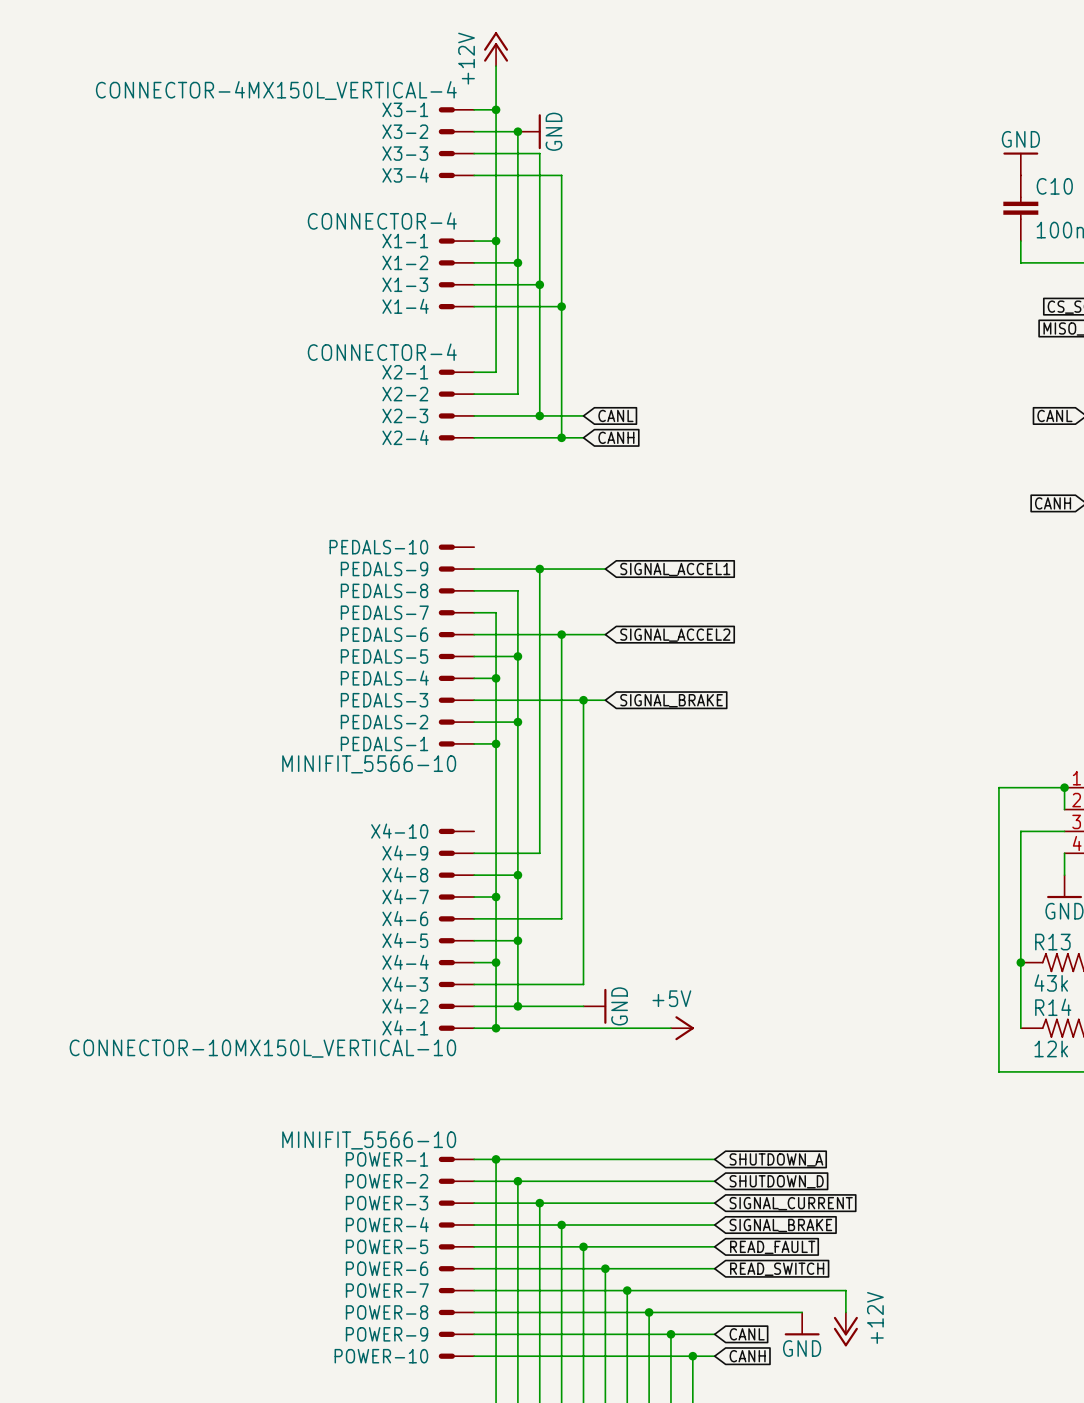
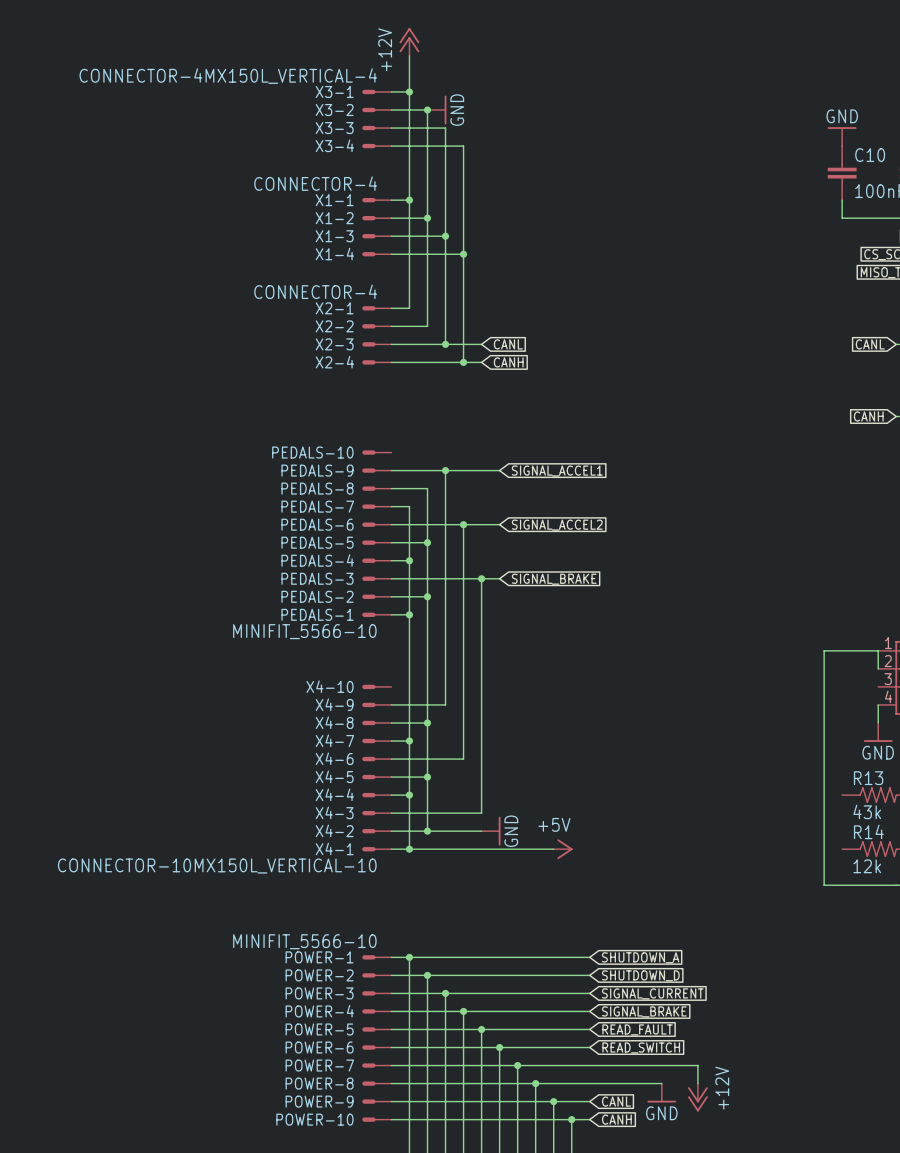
junction: (1064, 787) -> none
wire: (1064, 831) (1020, 831) (1020, 1028) -> none
junction: (1020, 962) -> none

